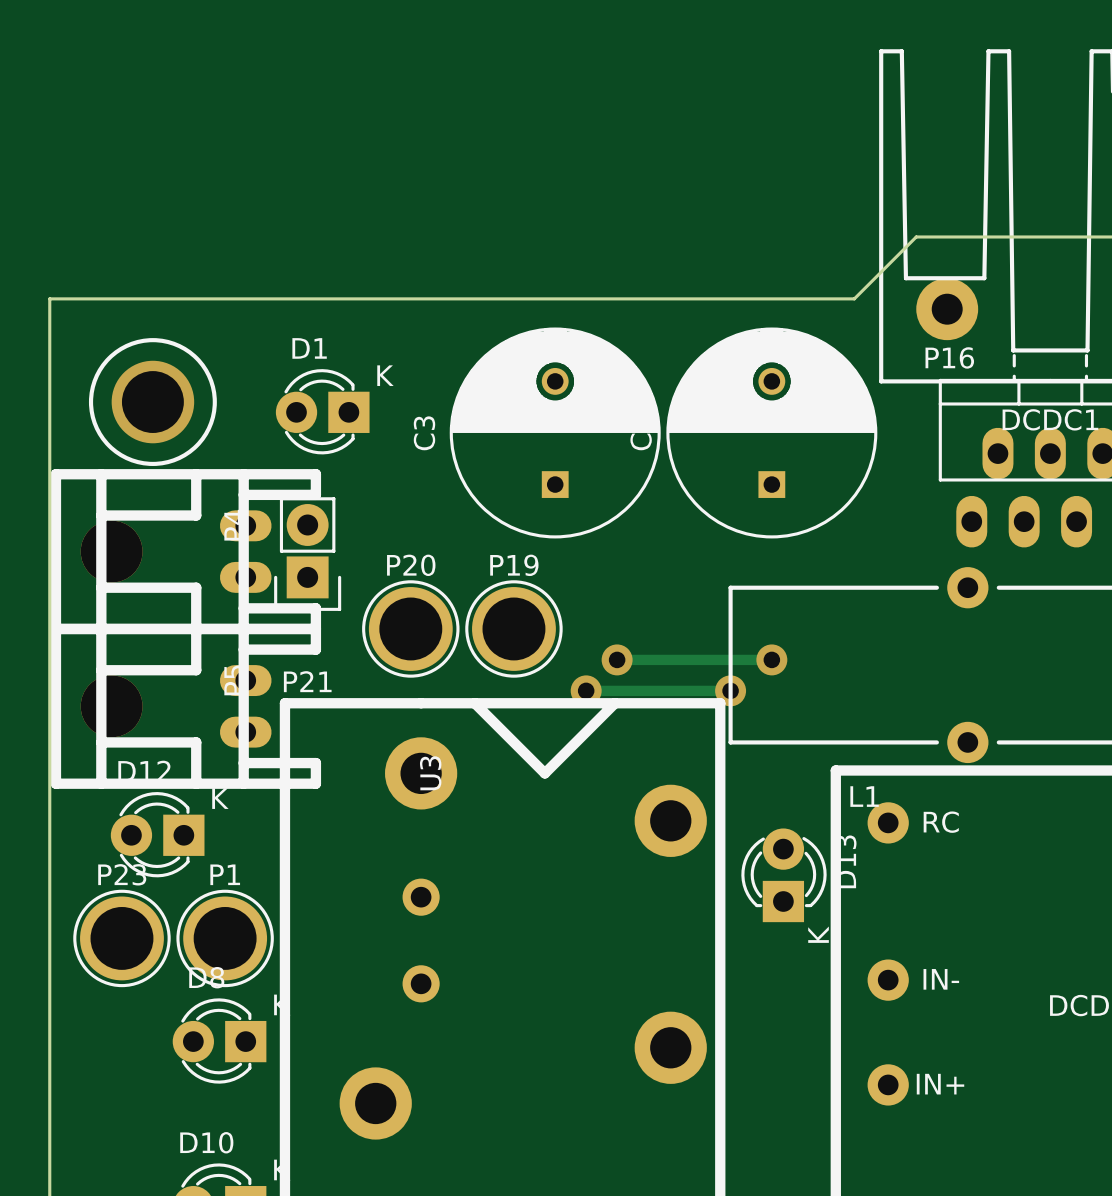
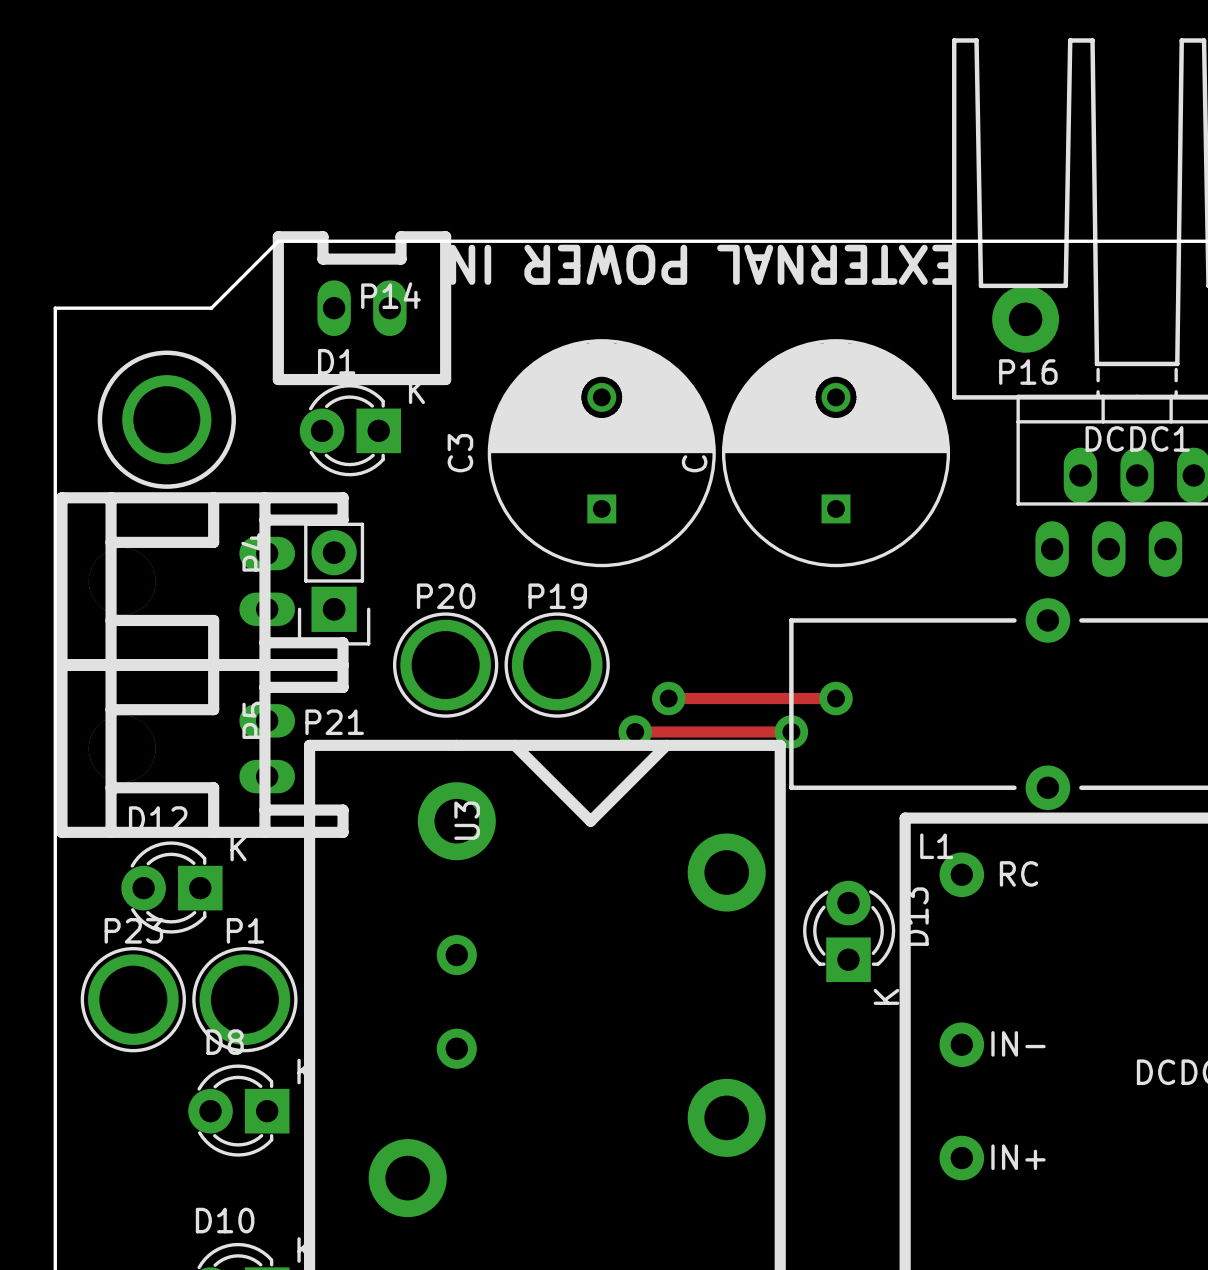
board edge: (916, 236) (854, 298) (194, 298) -> (992, 241) (278, 241) (211, 308)
text: none -> EXTERNAL POWER IN (702, 264)
P14: none -> (362, 308)

